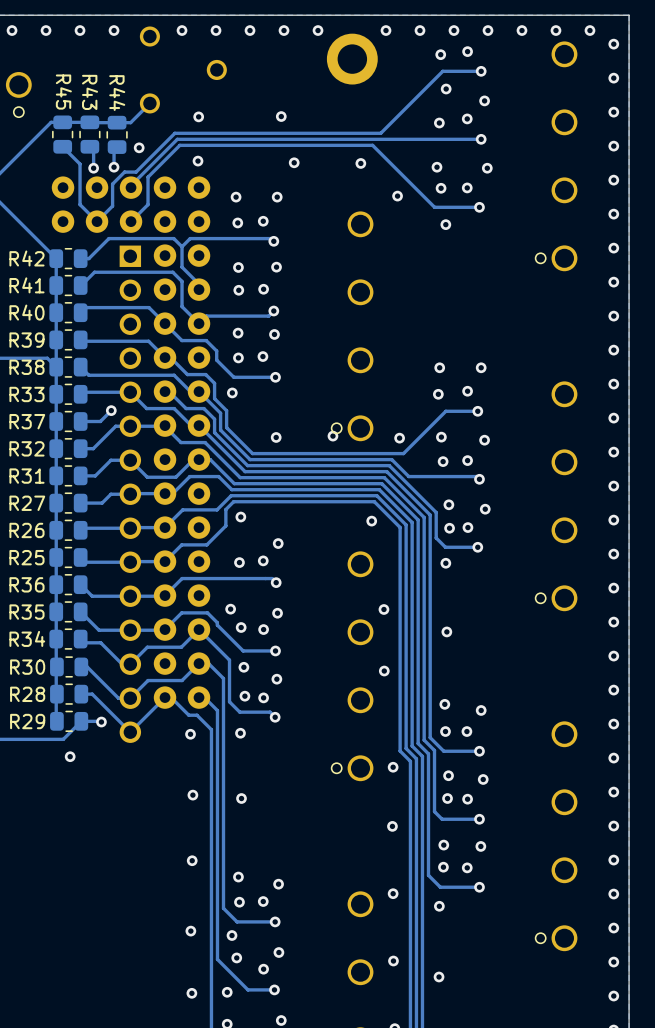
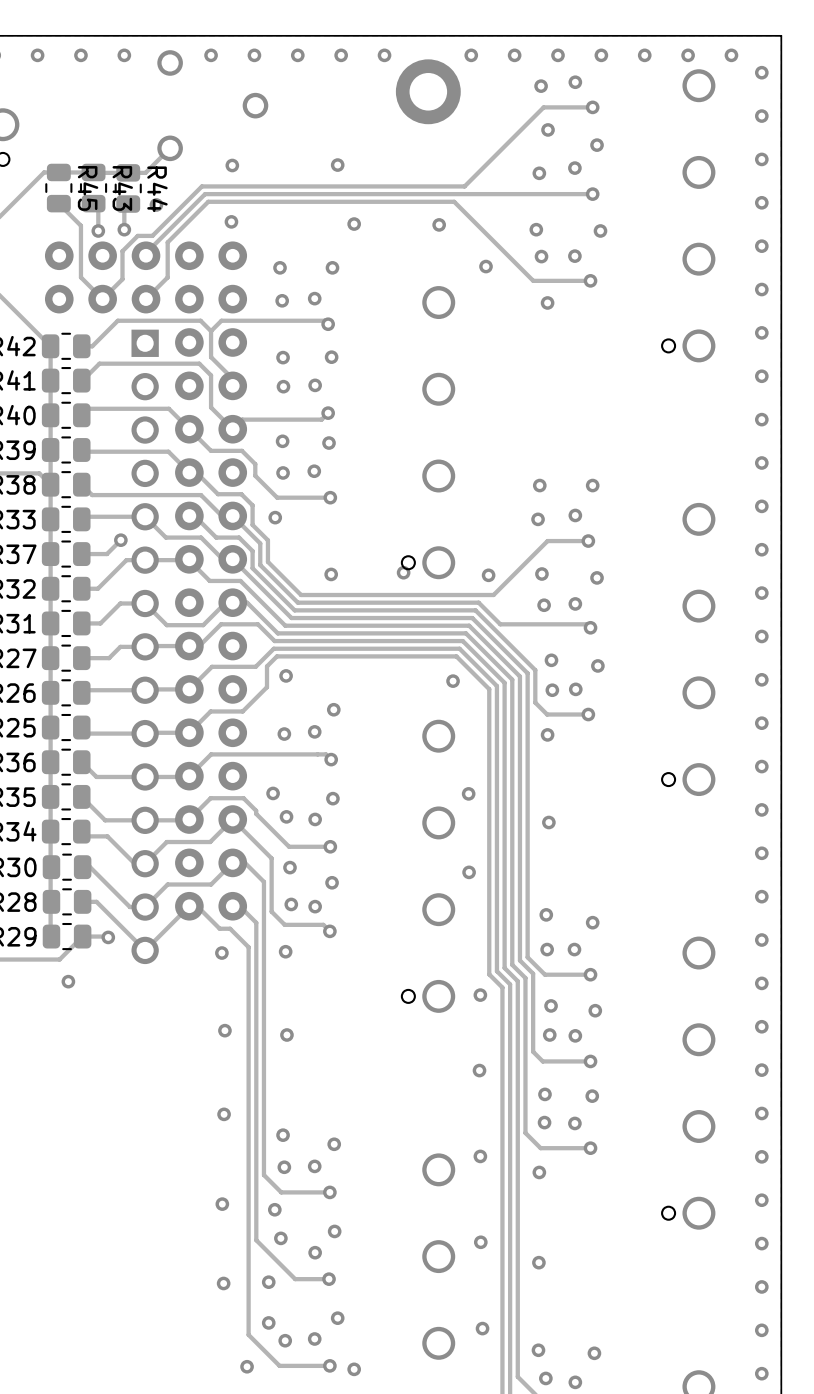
R45 name position: R45 (63, 92) -> R45 (88, 188)
R43 name position: R43 (90, 92) -> R43 (122, 188)
R44 name position: R44 (117, 93) -> R44 (157, 189)

